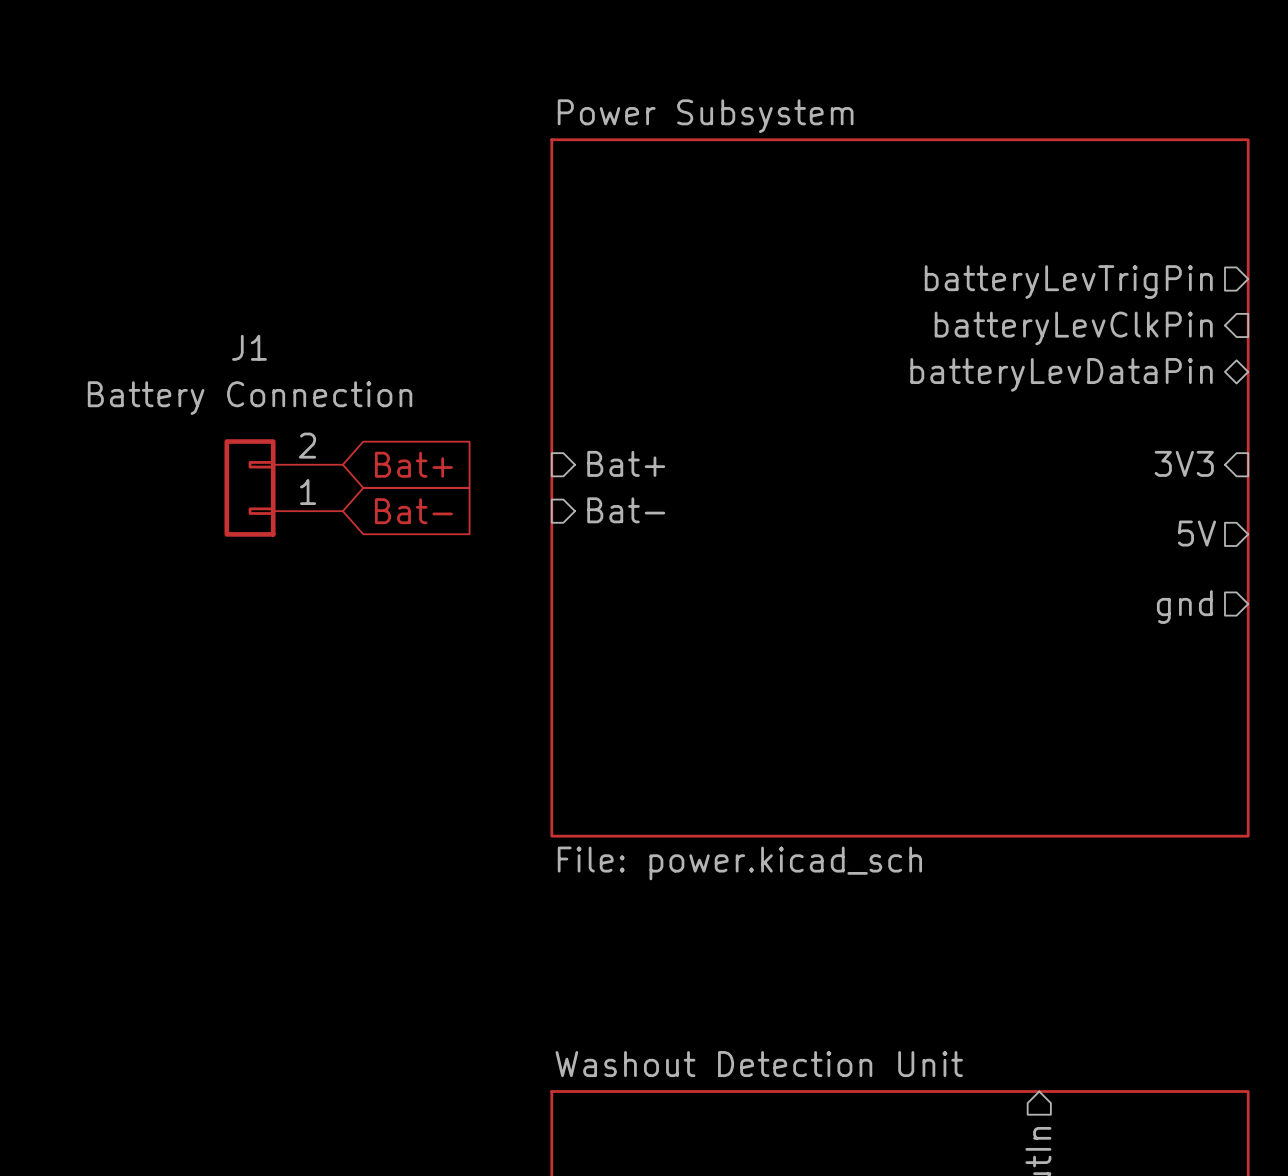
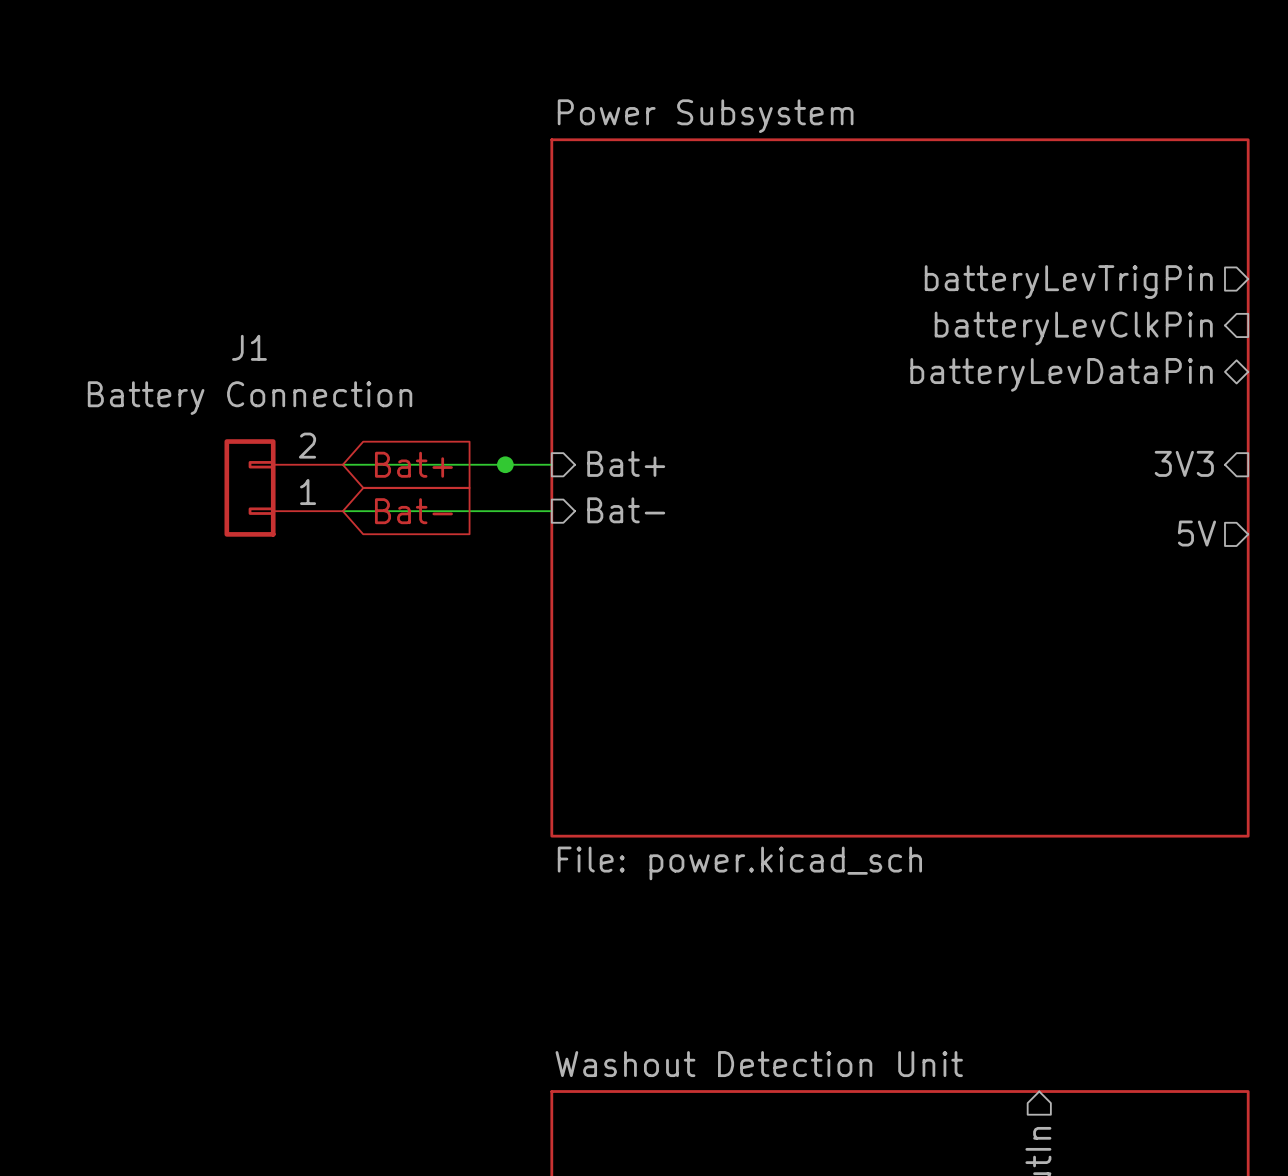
wire: none -> (342, 464) (551, 464)
junction: none -> (505, 464)
wire: none -> (342, 511) (551, 511)
sheet pin: gnd (1184, 607) -> none

